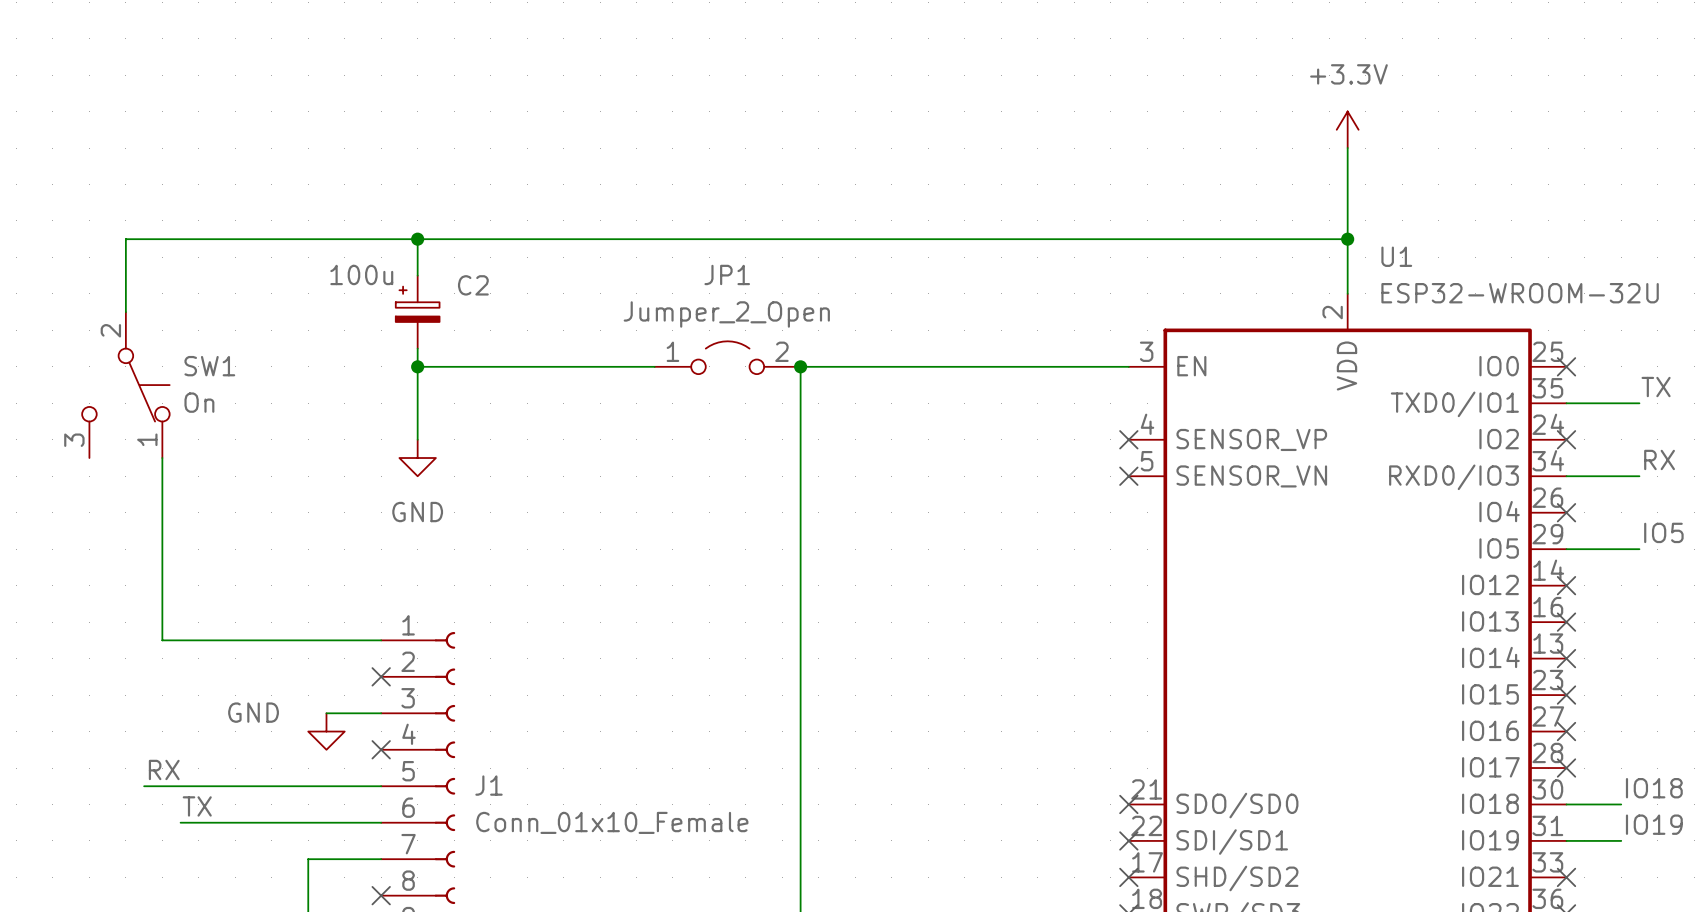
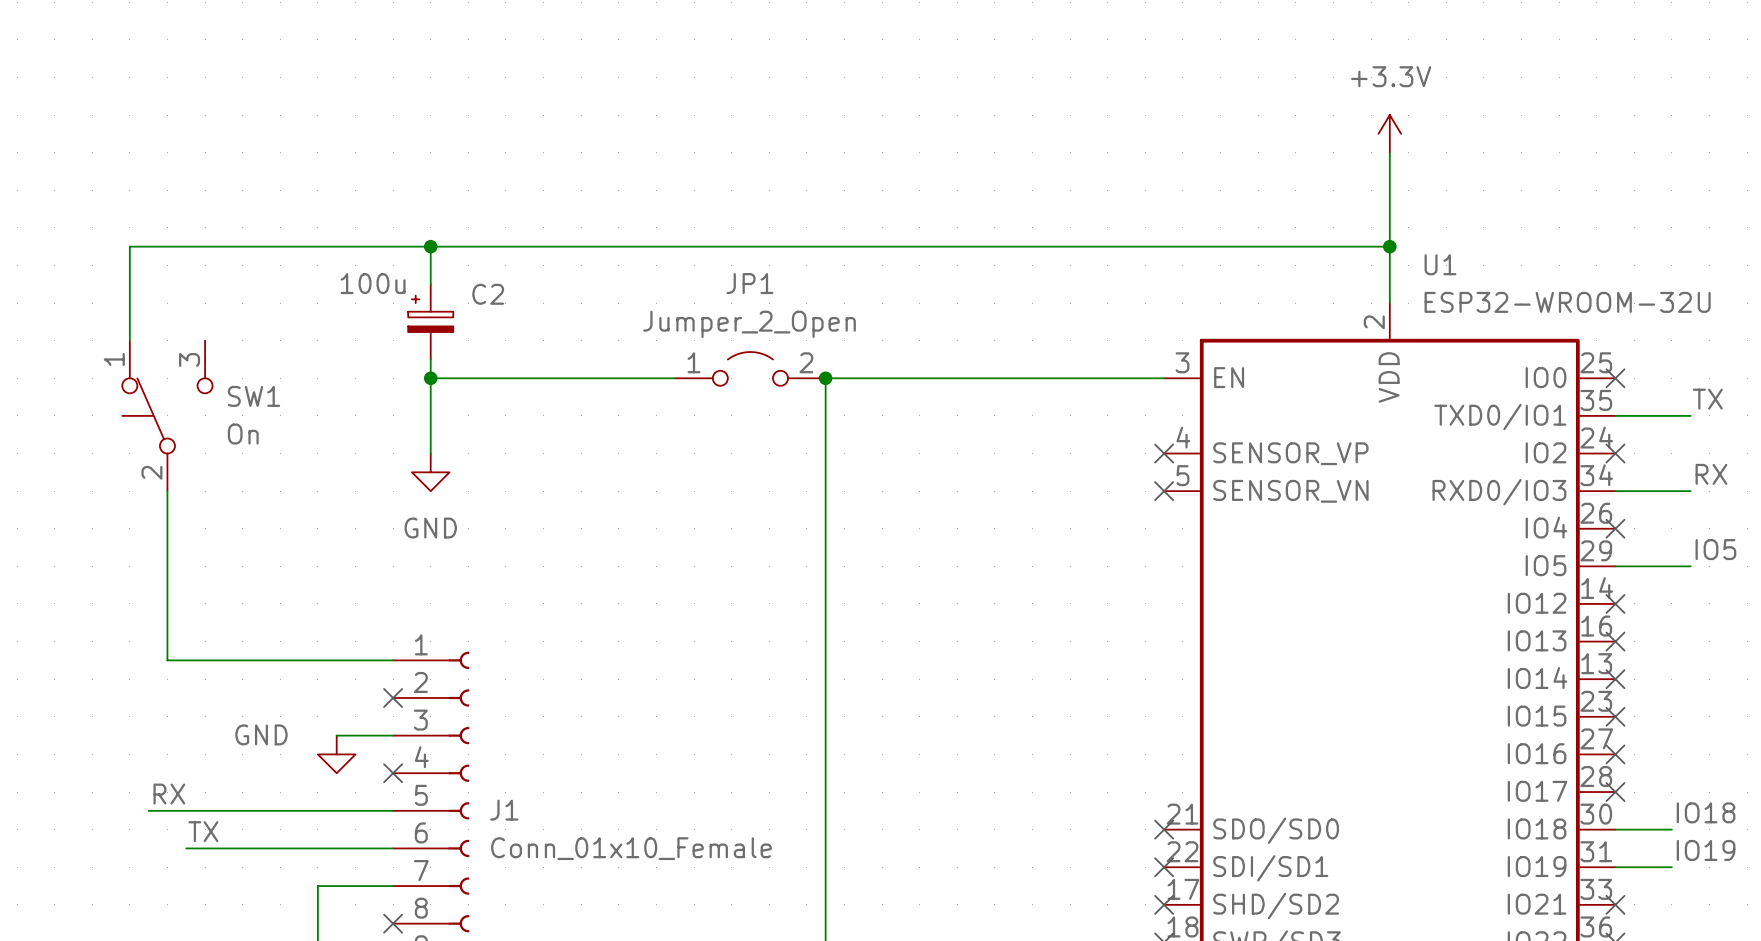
SW1 rotation: 0° (125, 385) -> 180° (167, 415)

